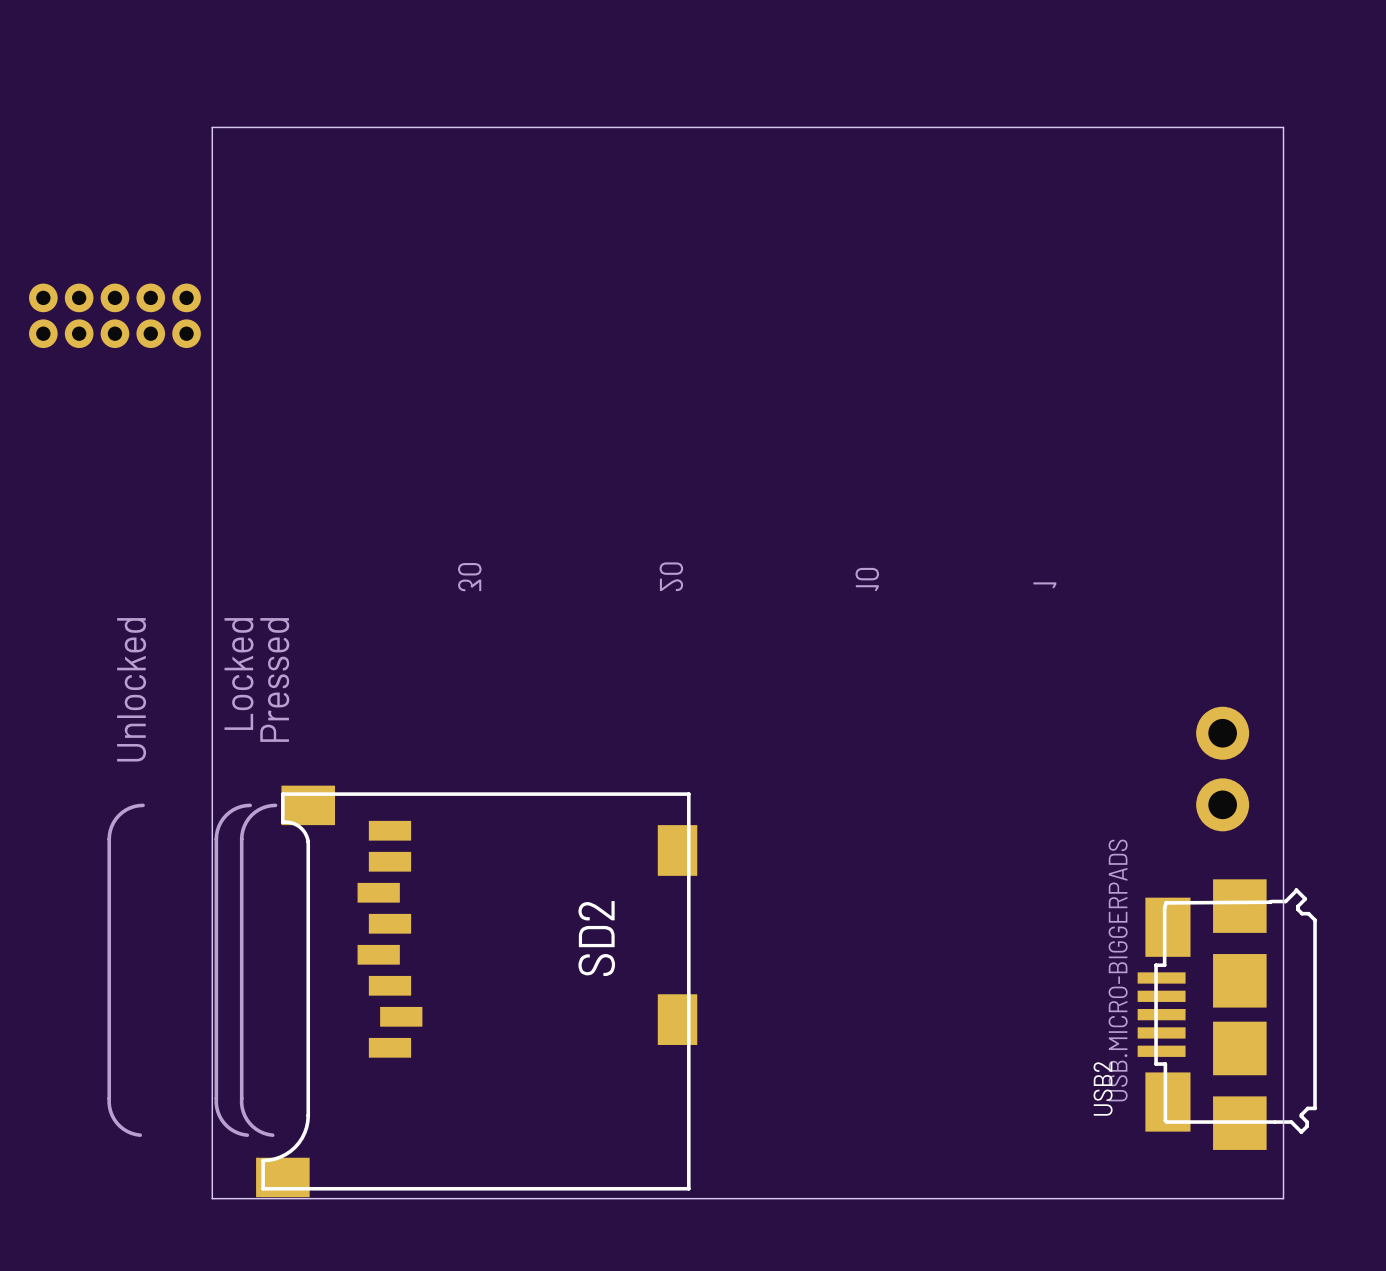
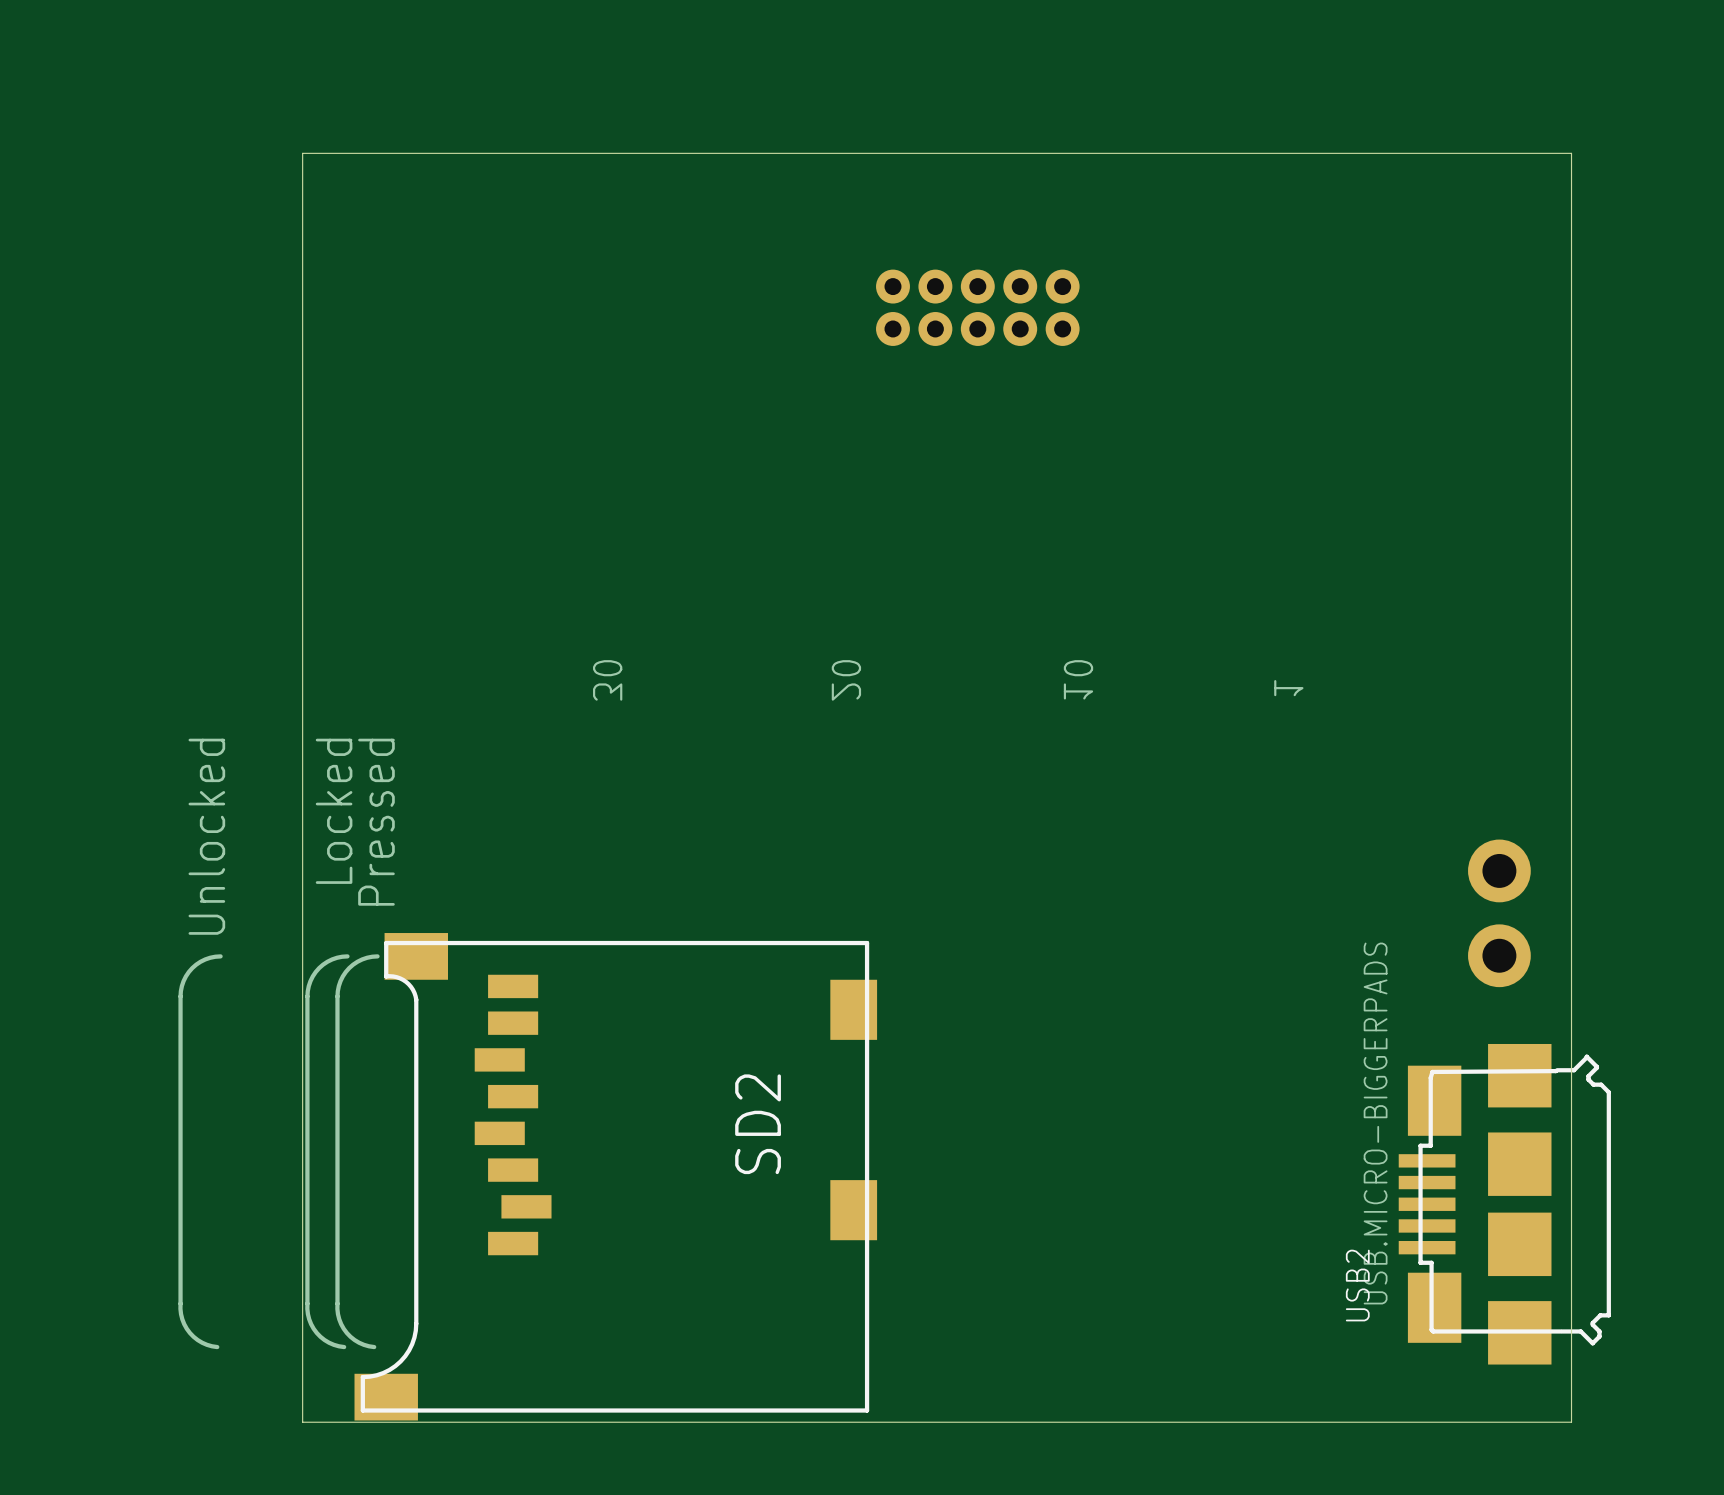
part position: (114, 315) -> (977, 307)

